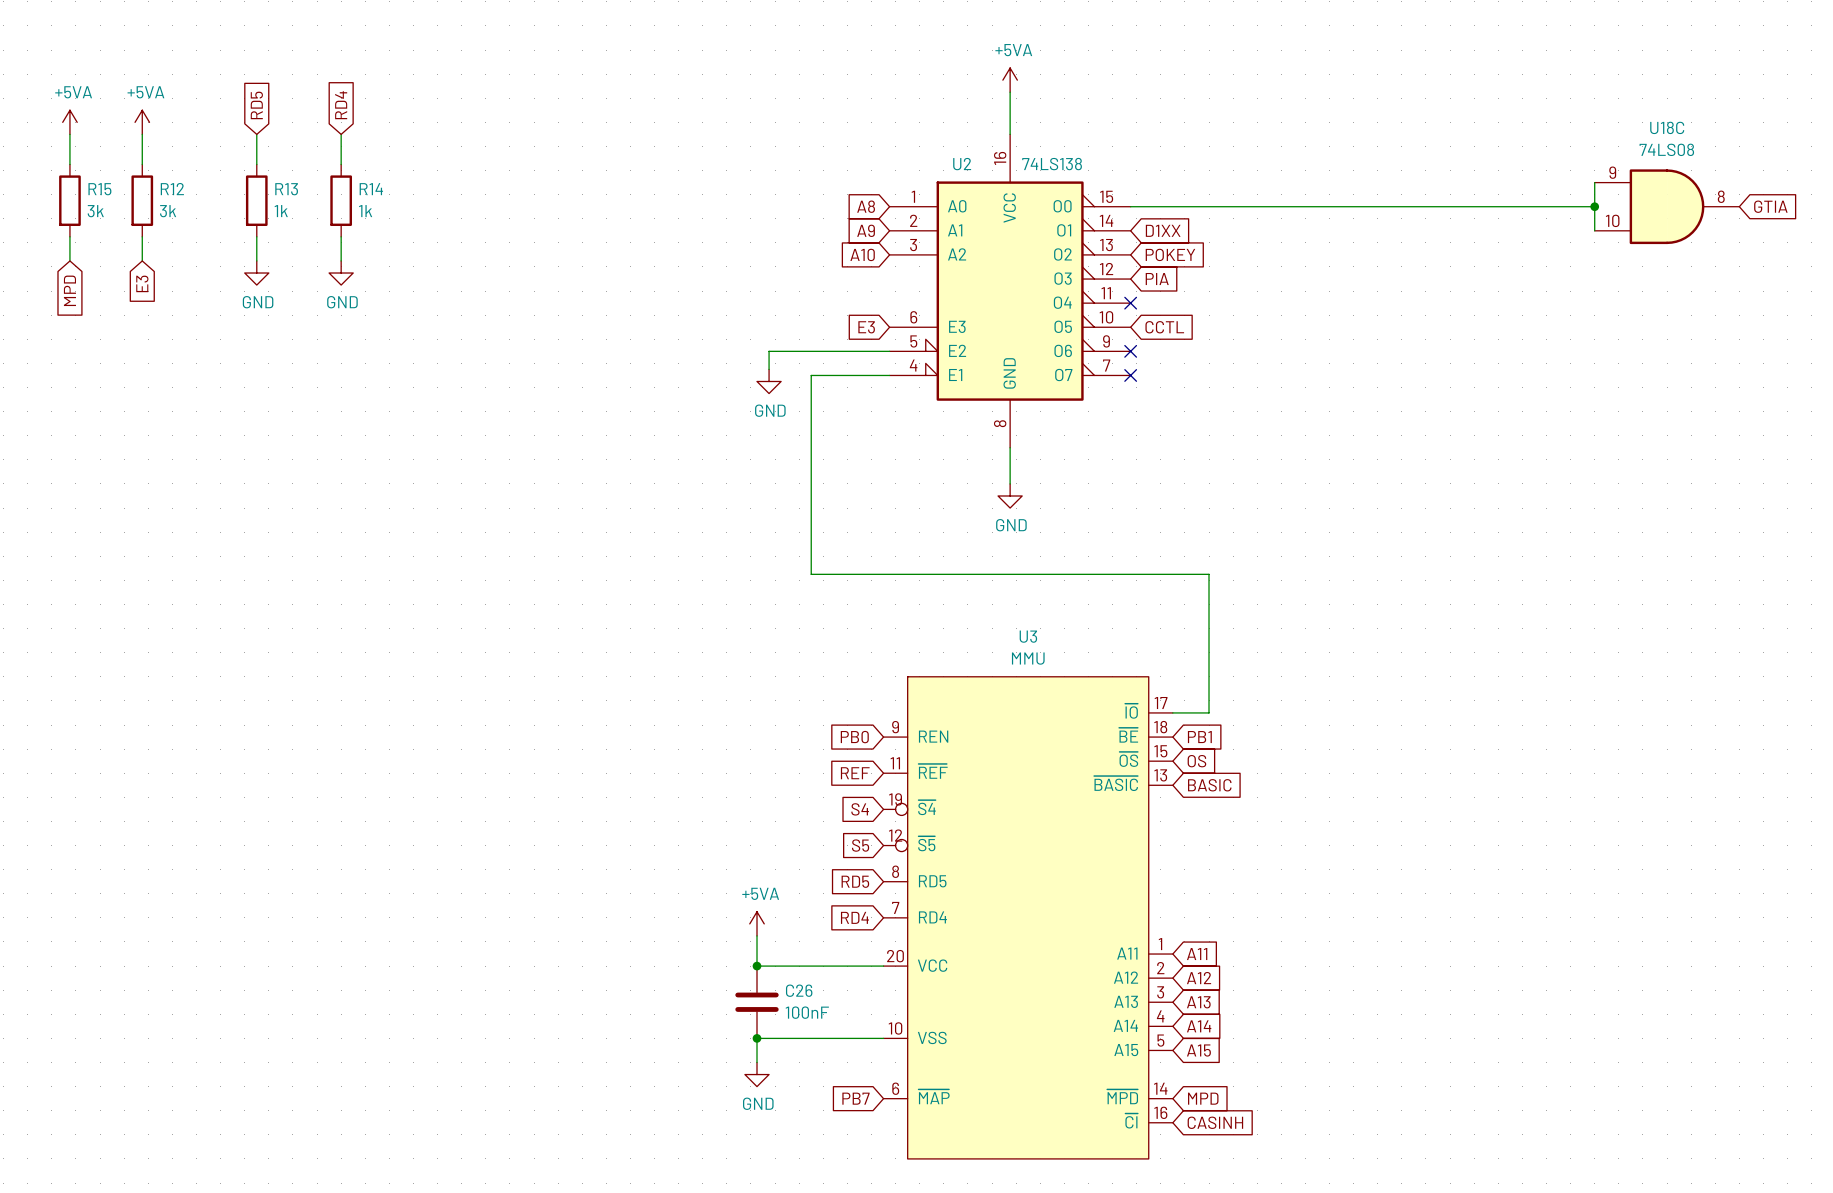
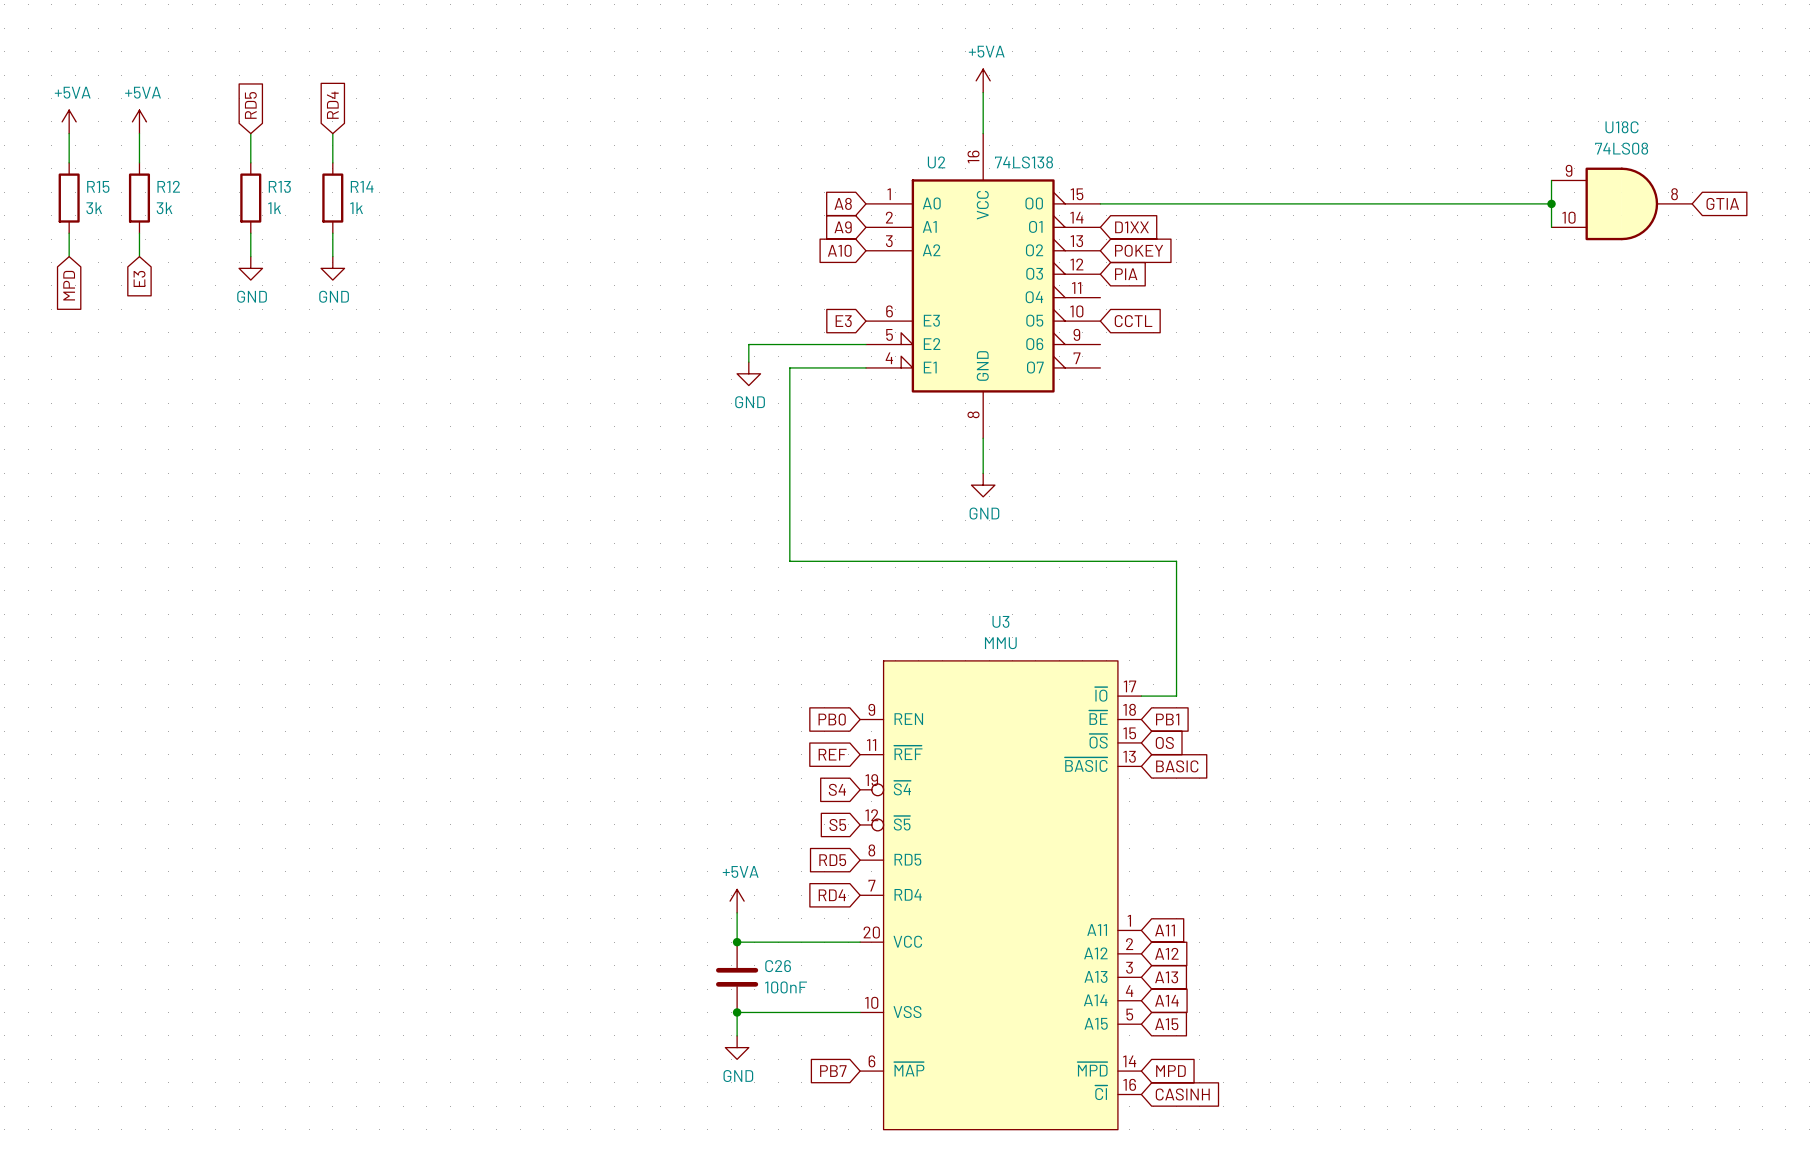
no-connect mark: (1130, 303) -> none
no-connect mark: (1130, 351) -> none
no-connect mark: (1130, 375) -> none

